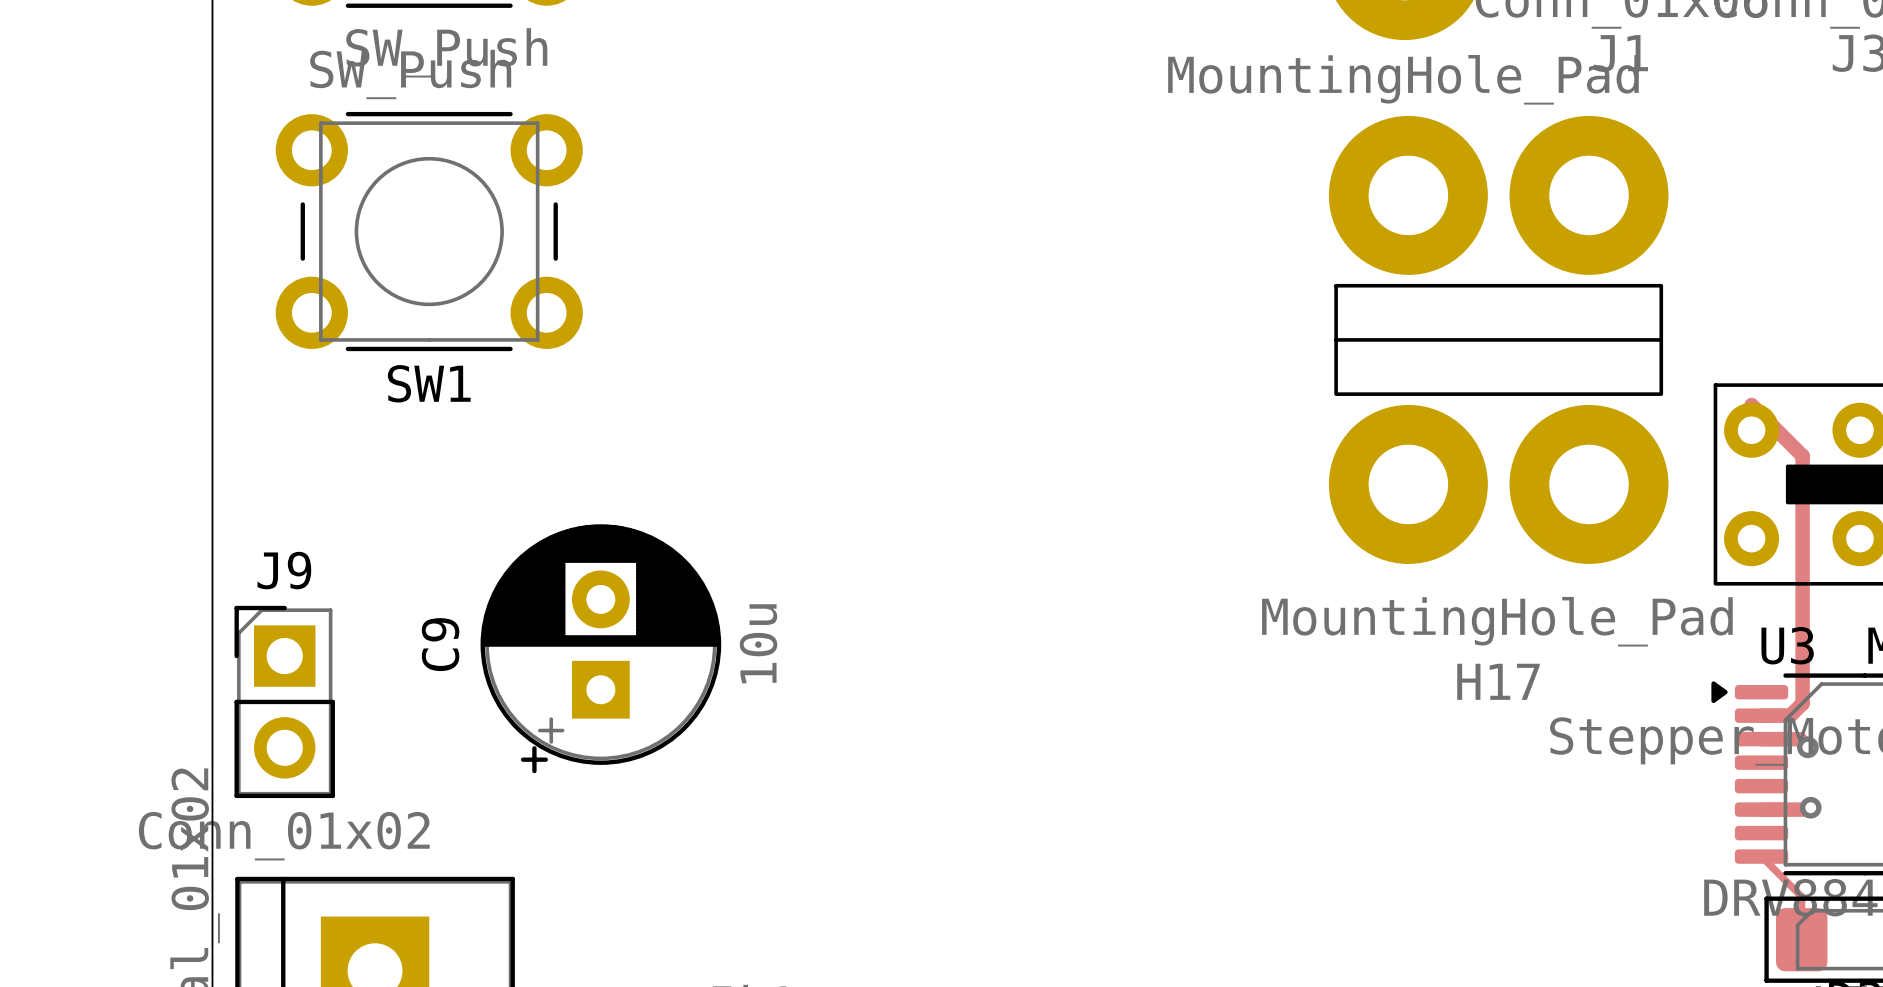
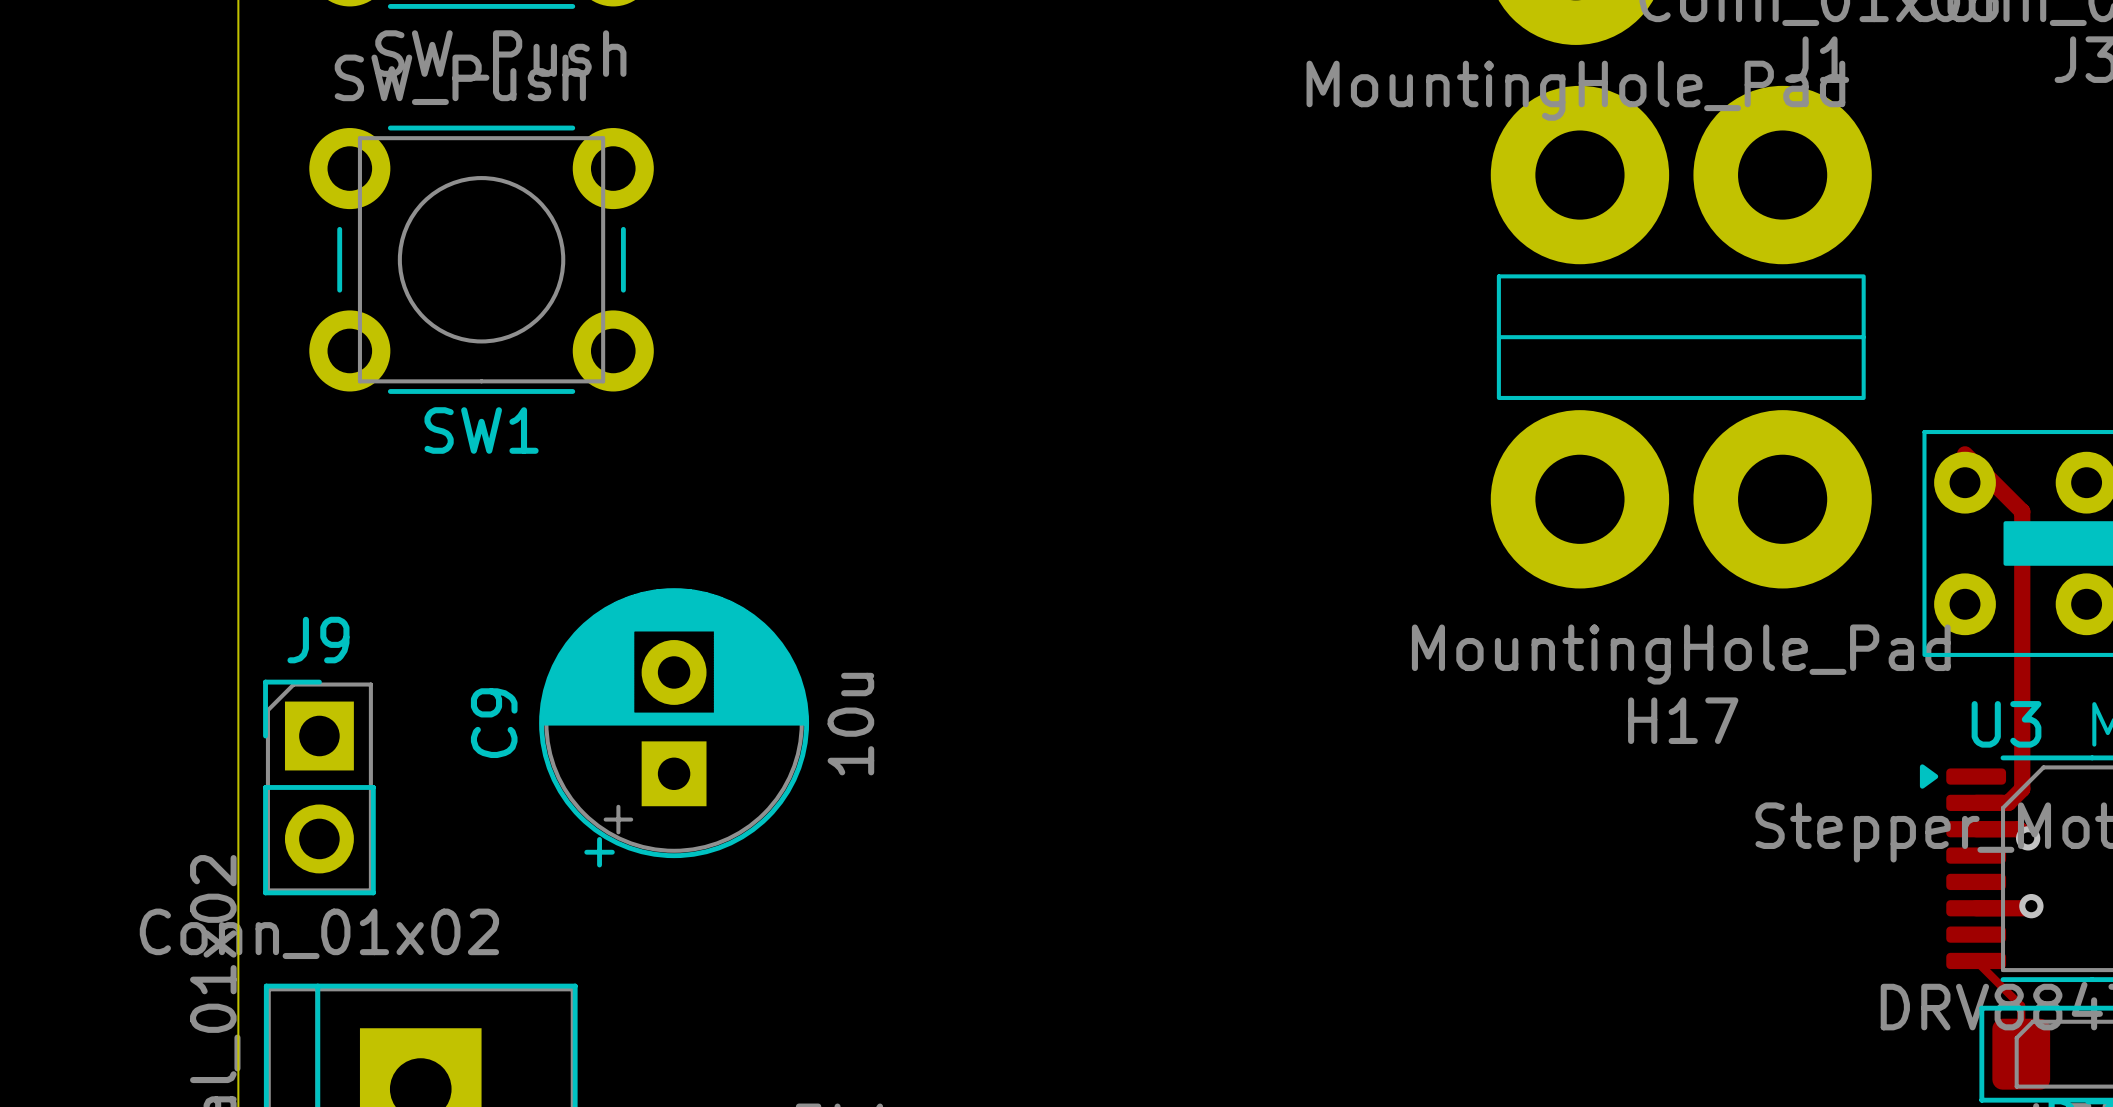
H17 position: (1498, 339) -> (1681, 337)

